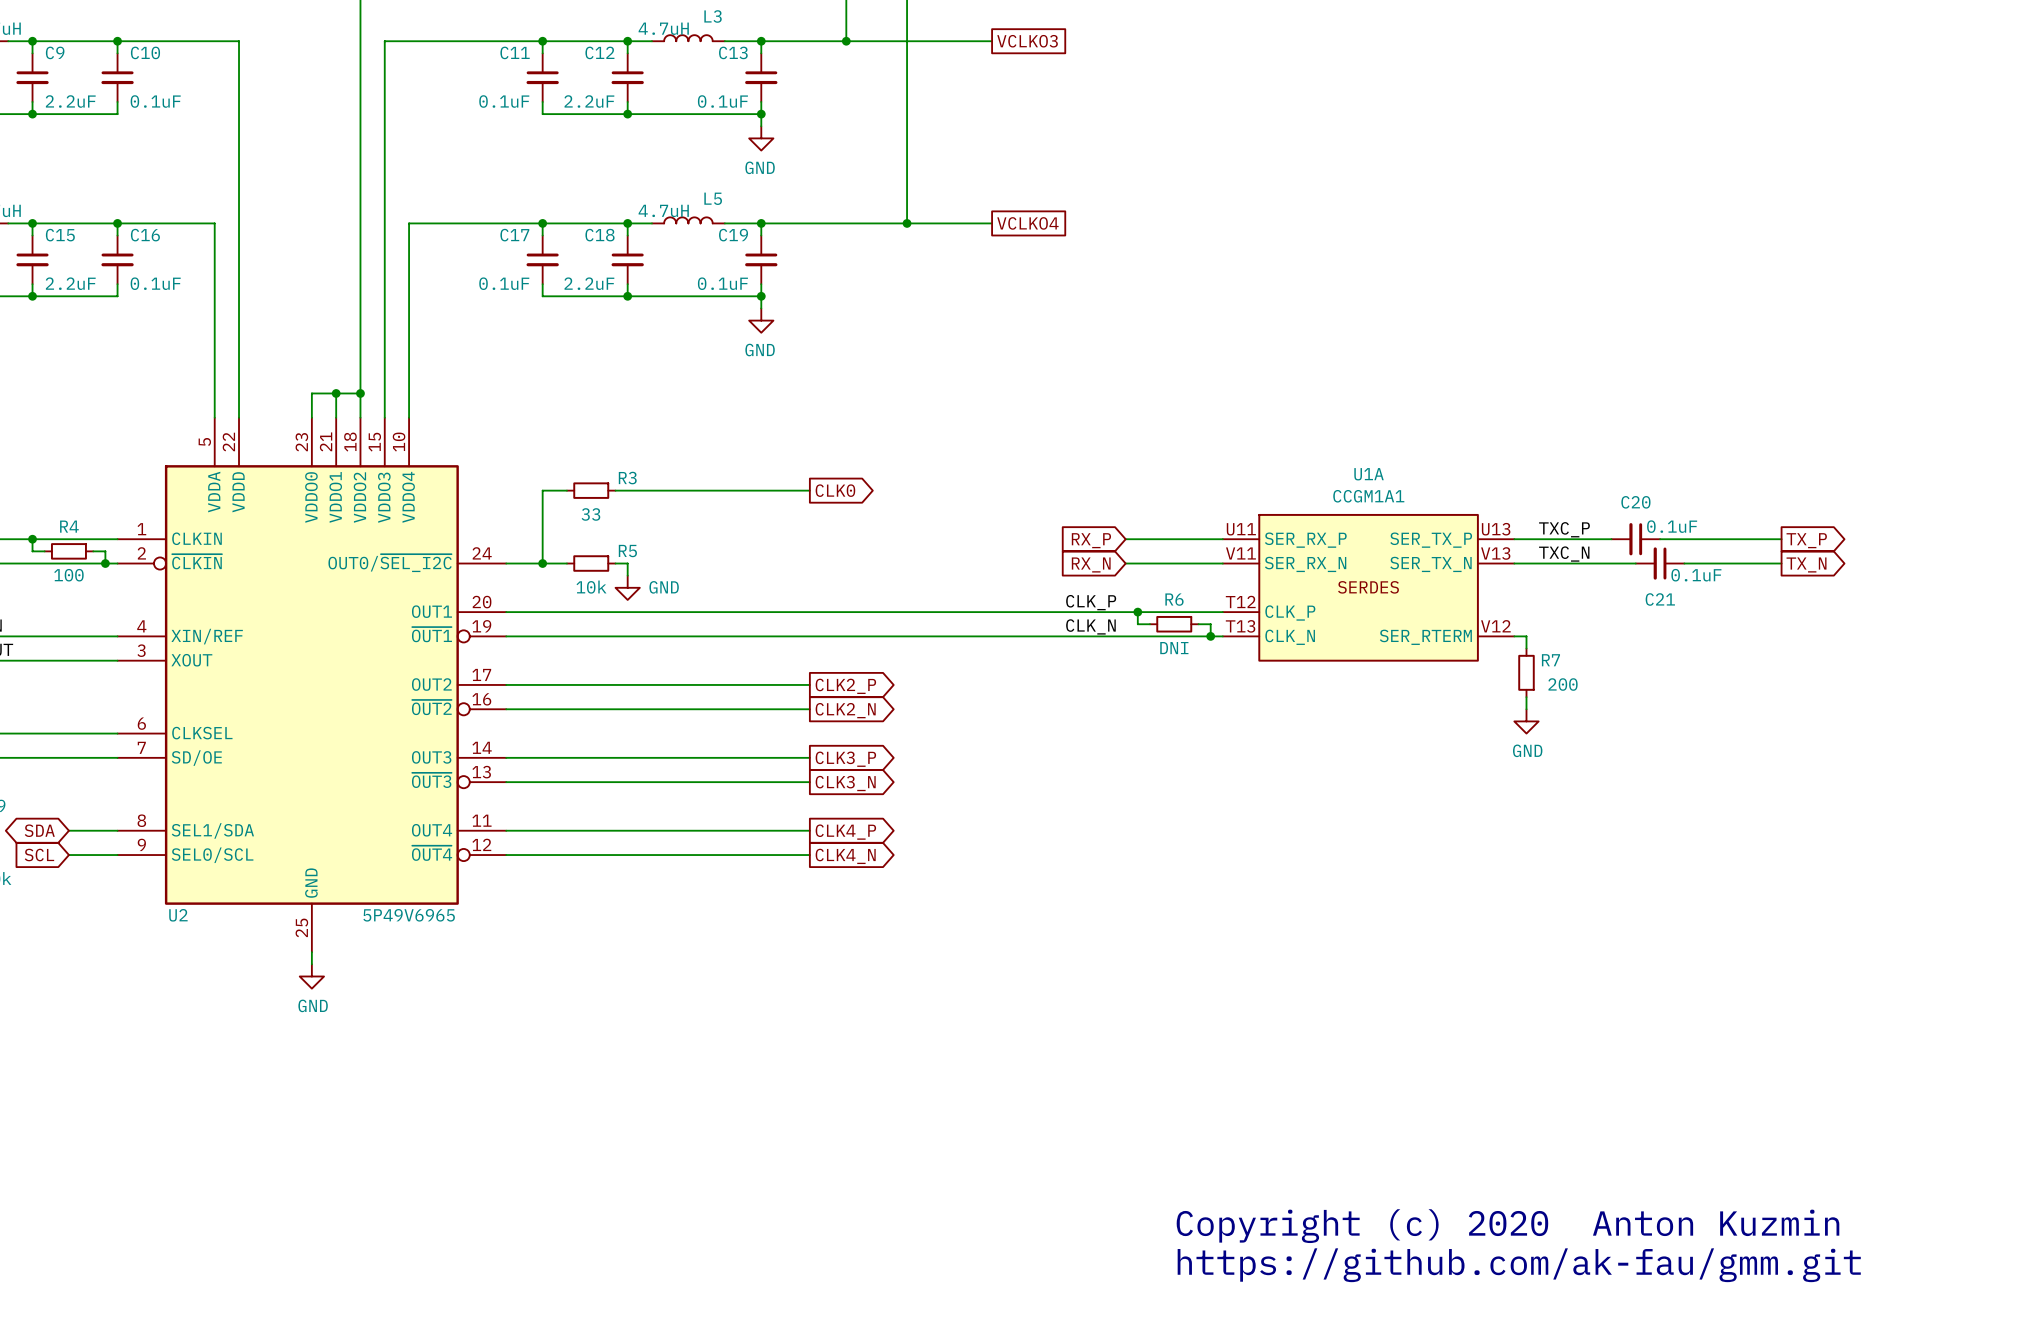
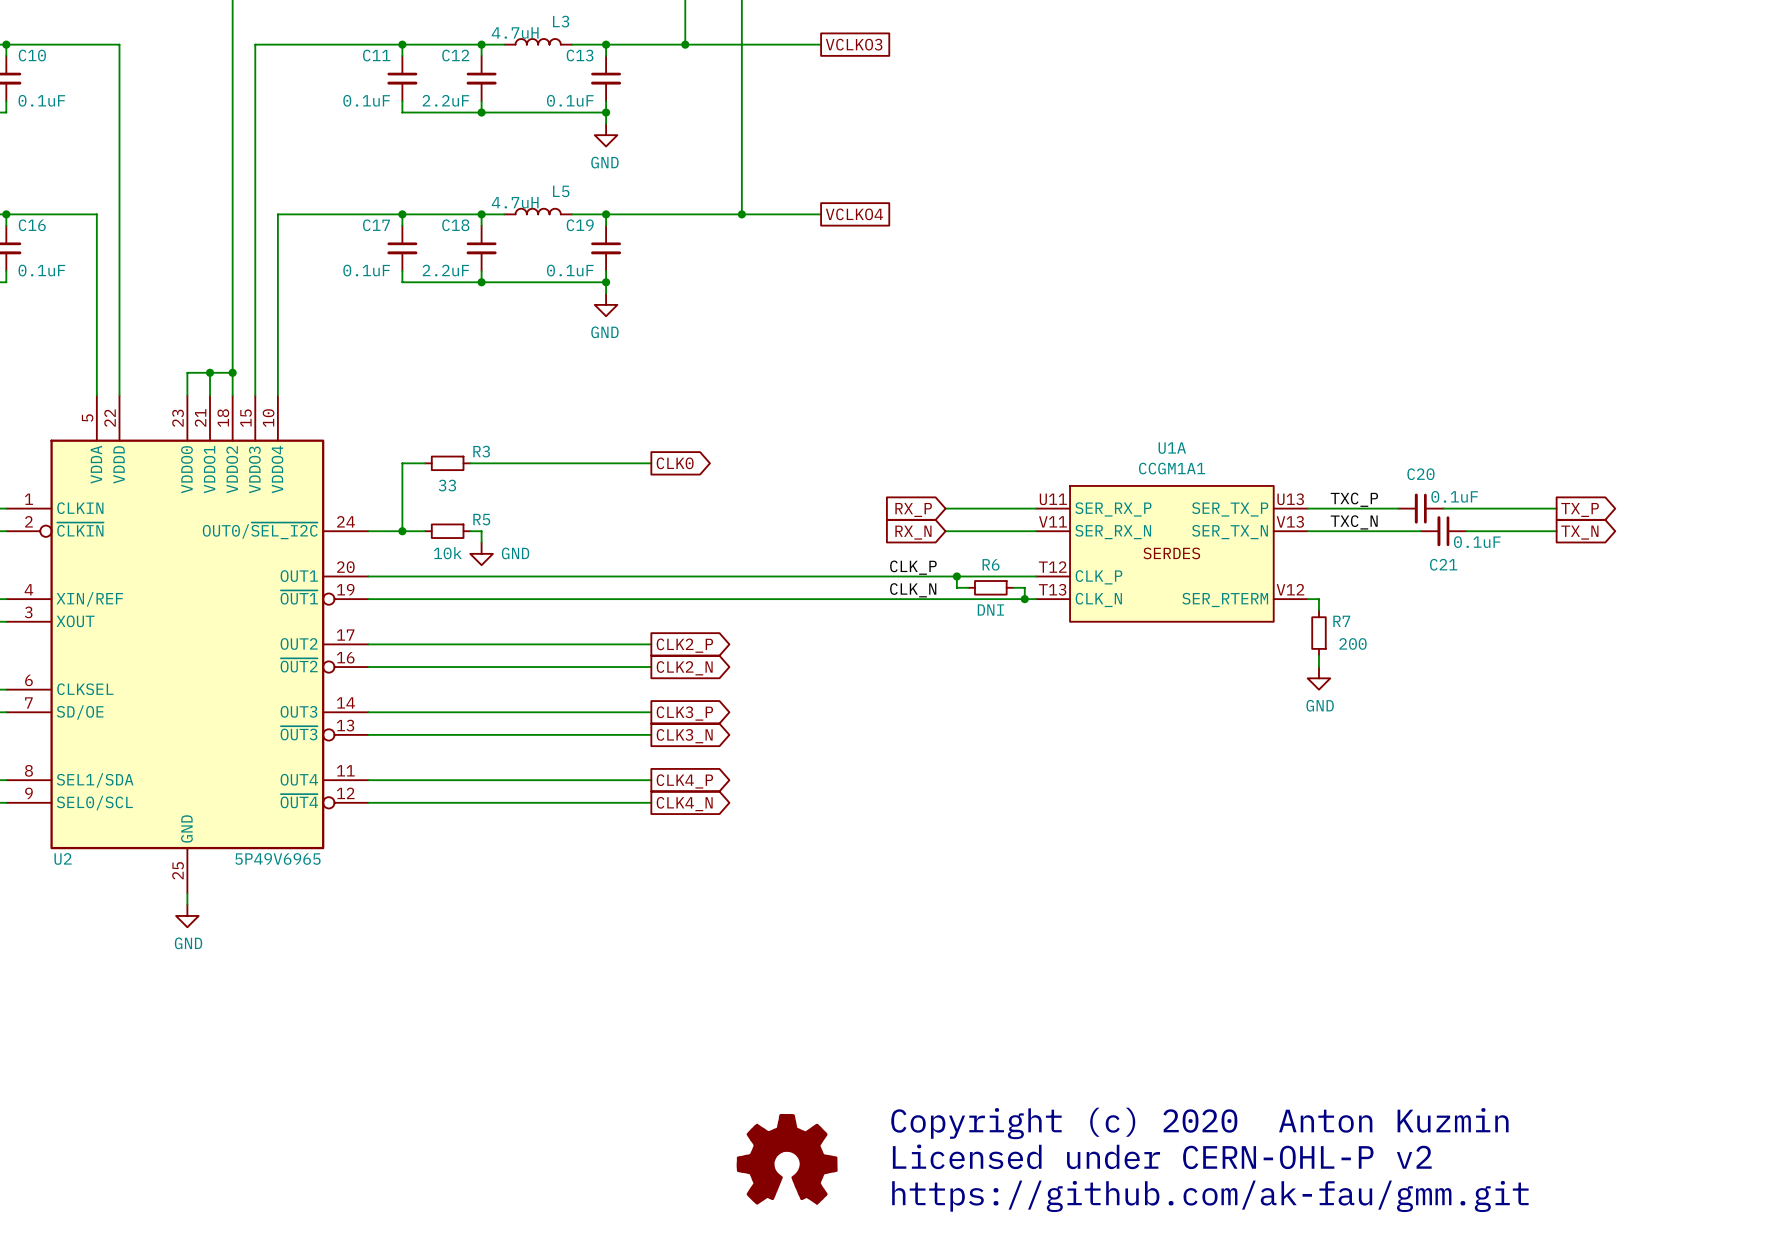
text position: Copyright (c) 2020 Anton Kuzmin (1507, 1226) -> Copyright (c) 2020 Anton Kuzmin (1199, 1123)
text: none -> Licensed under CERN-OHL-P v2 (1162, 1156)
power symbol: none -> (787, 1159)
text position: https://github.com/ak-fau/gmm.git (1519, 1265) -> https://github.com/ak-fau/gmm.git (1210, 1196)

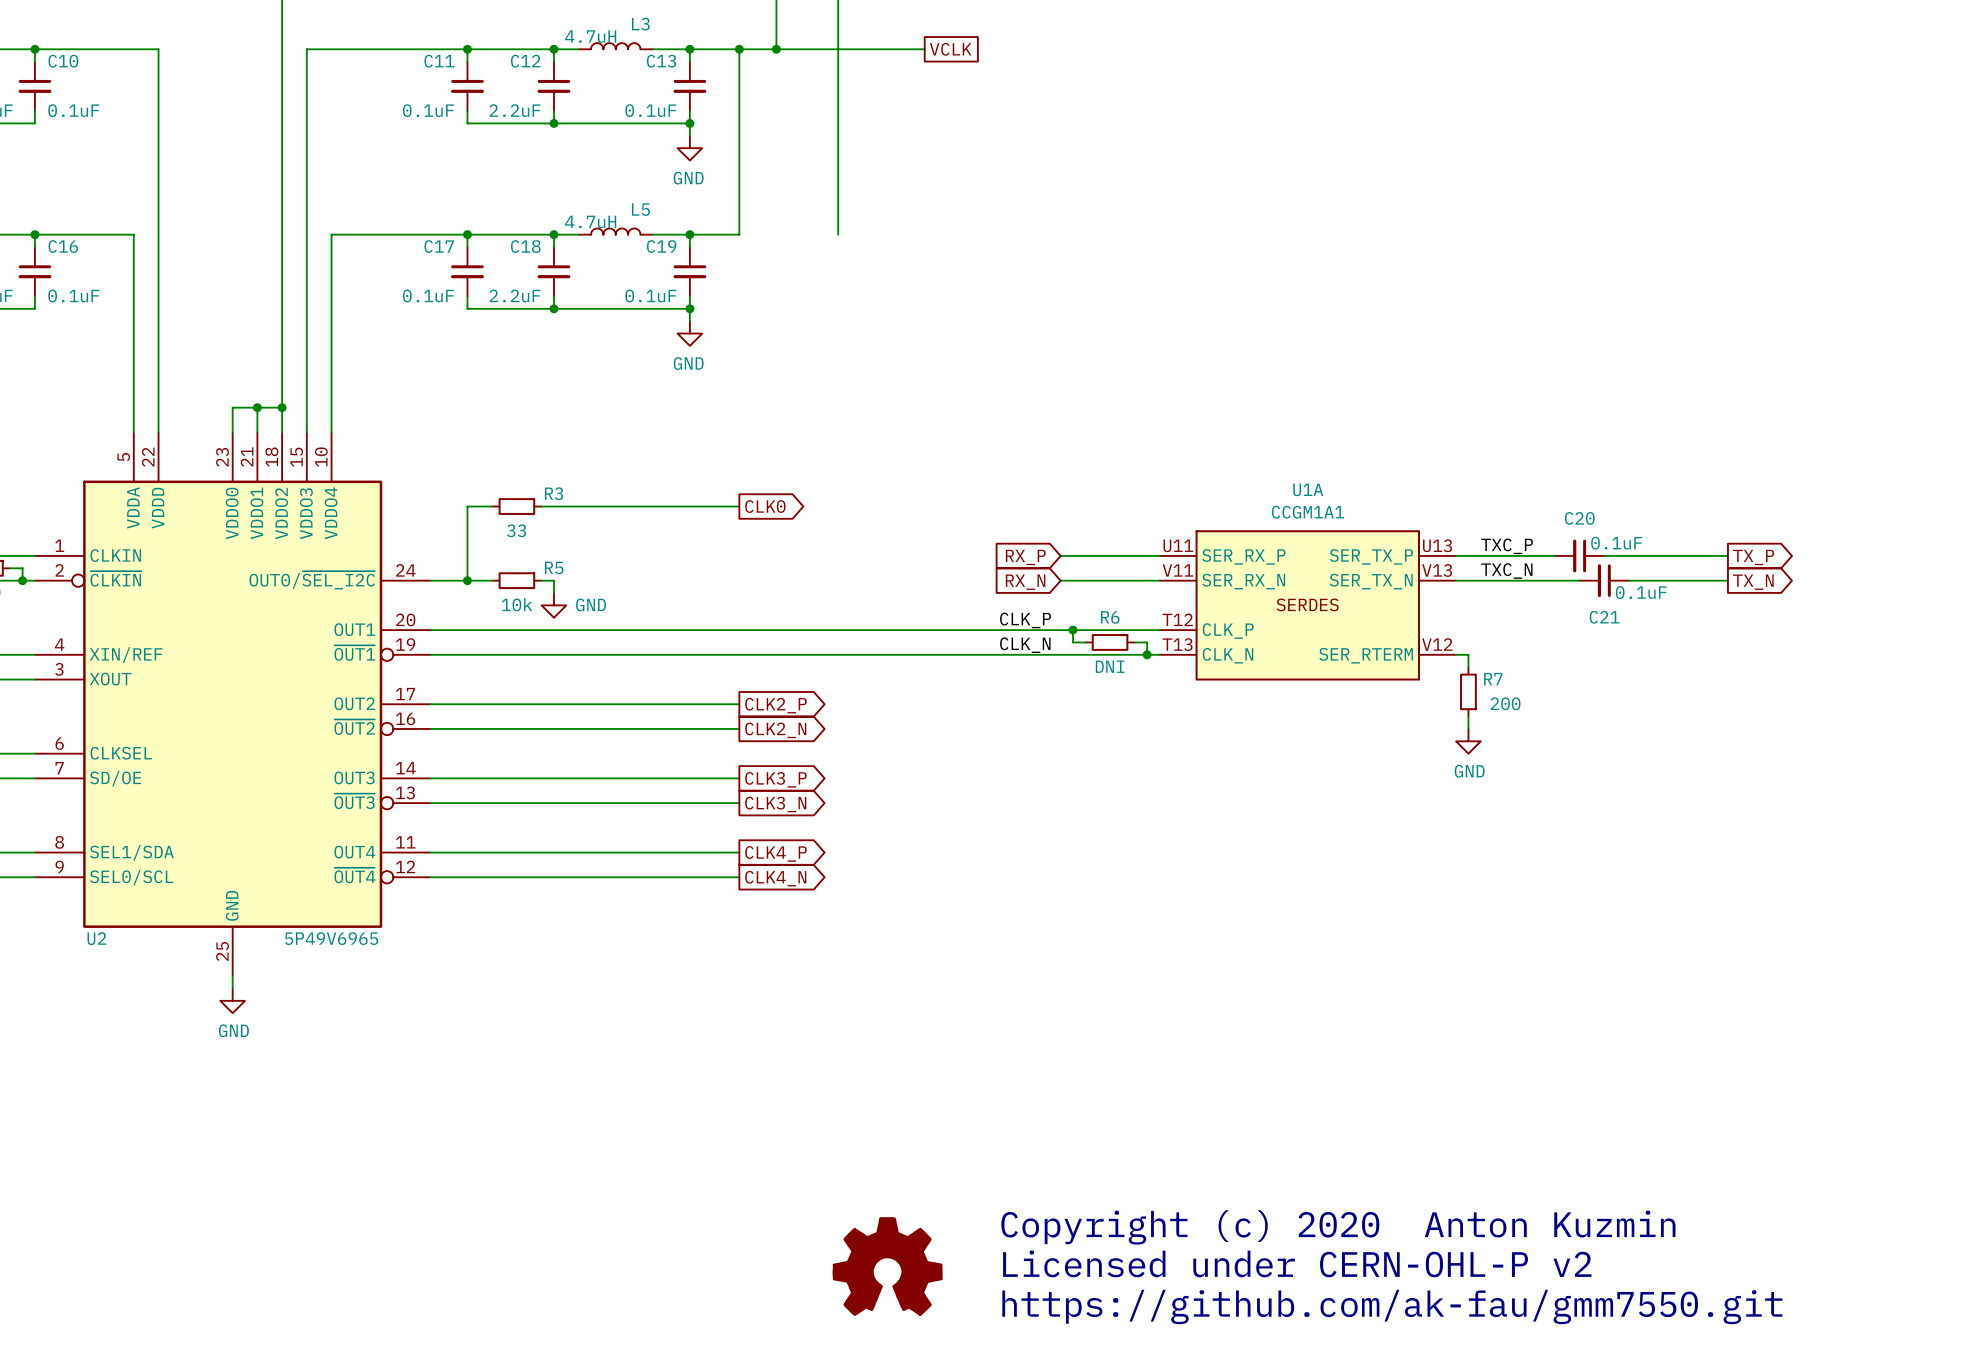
junction: none -> (739, 49)
global label: VCLKO3 (854, 44) -> VCLK (950, 49)
wire: (651, 214) (821, 214) -> (739, 234) (739, 49)
junction: (741, 214) -> none
global label: VCLKO4 (854, 214) -> none
text: https://github.com/ak-fau/gmm.git (1210, 1196) -> https://github.com/ak-fau/gmm7550.git (1392, 1306)

